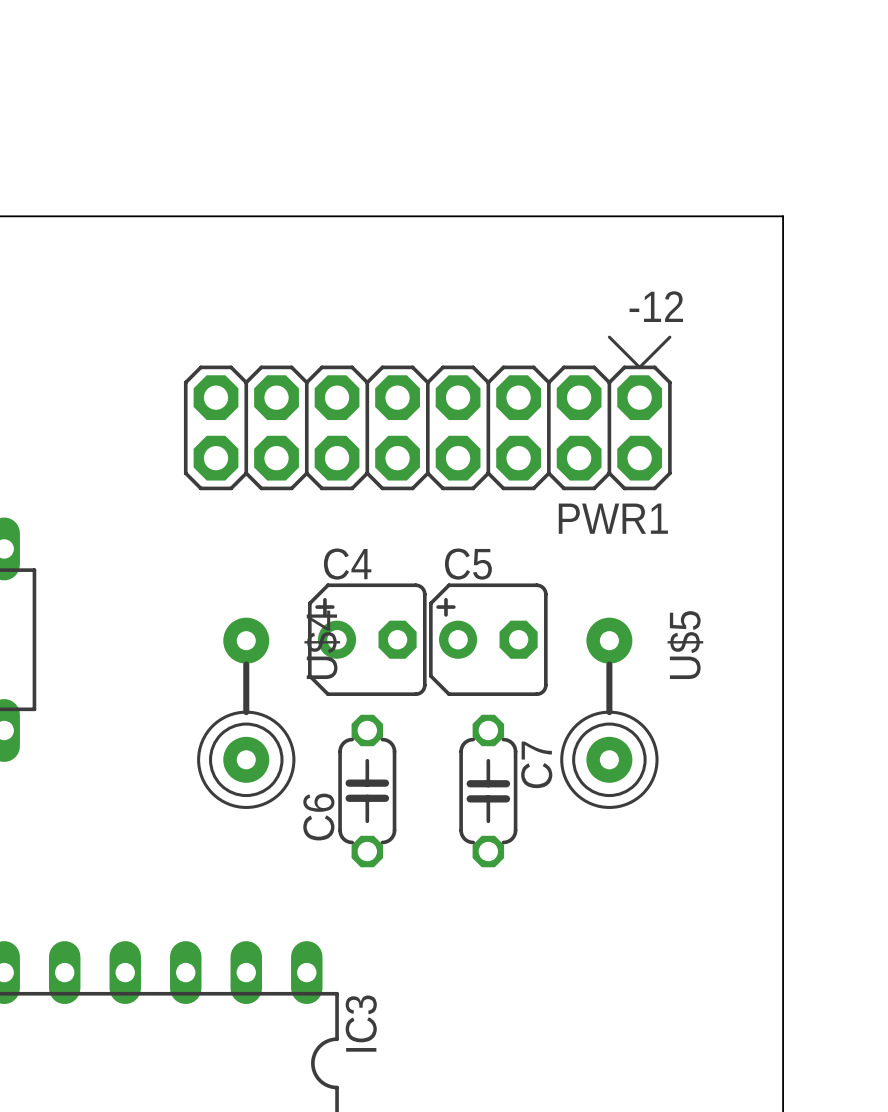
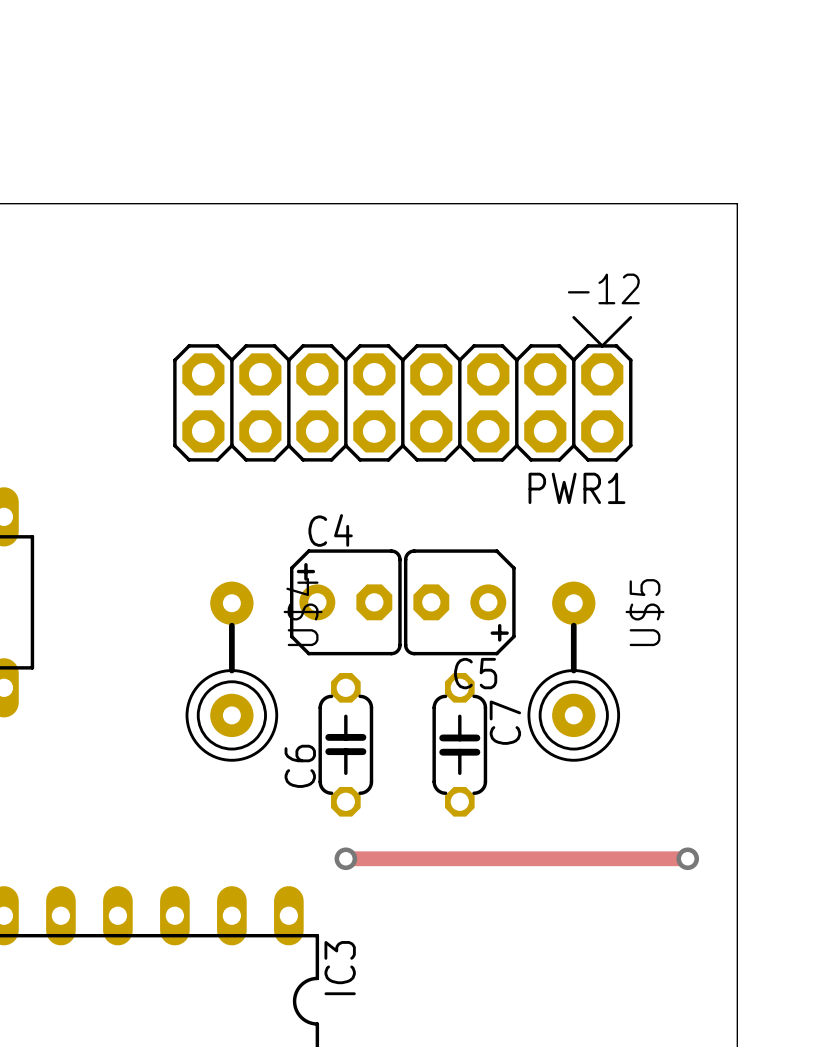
C5 rotation: 0° (488, 639) -> 180° (459, 602)
track: none -> (345, 858) (687, 858)
via: none -> (345, 858)
via: none -> (687, 858)

